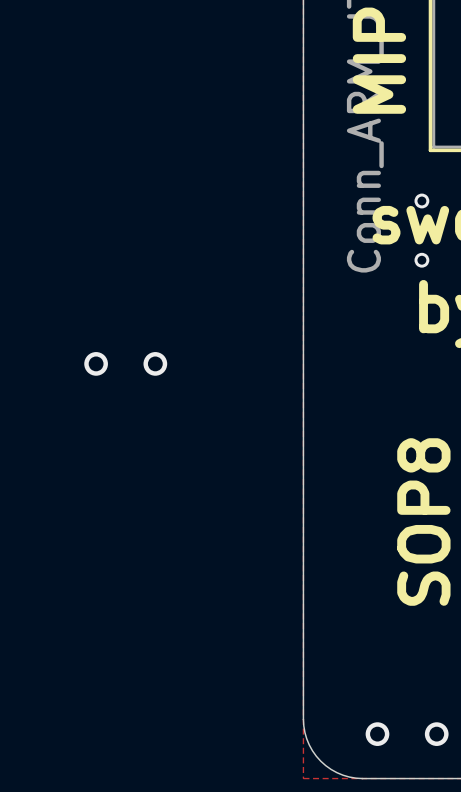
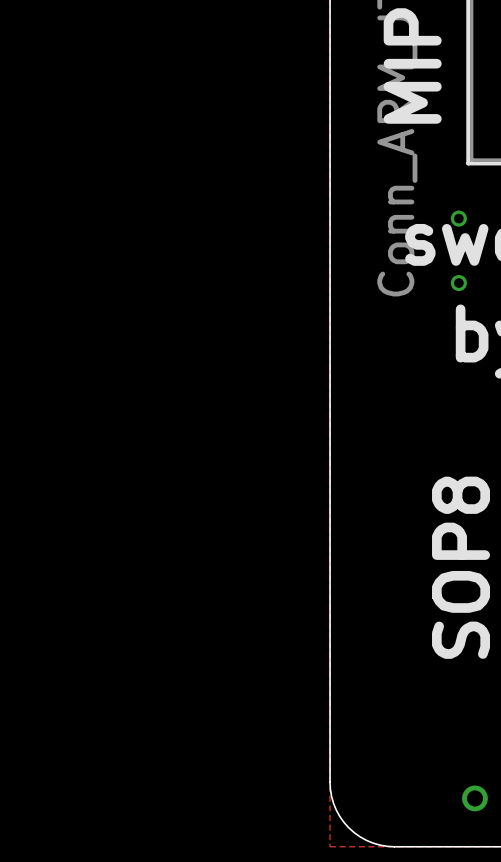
via: (96, 363) -> none
via: (155, 363) -> none
via: (377, 734) -> none

